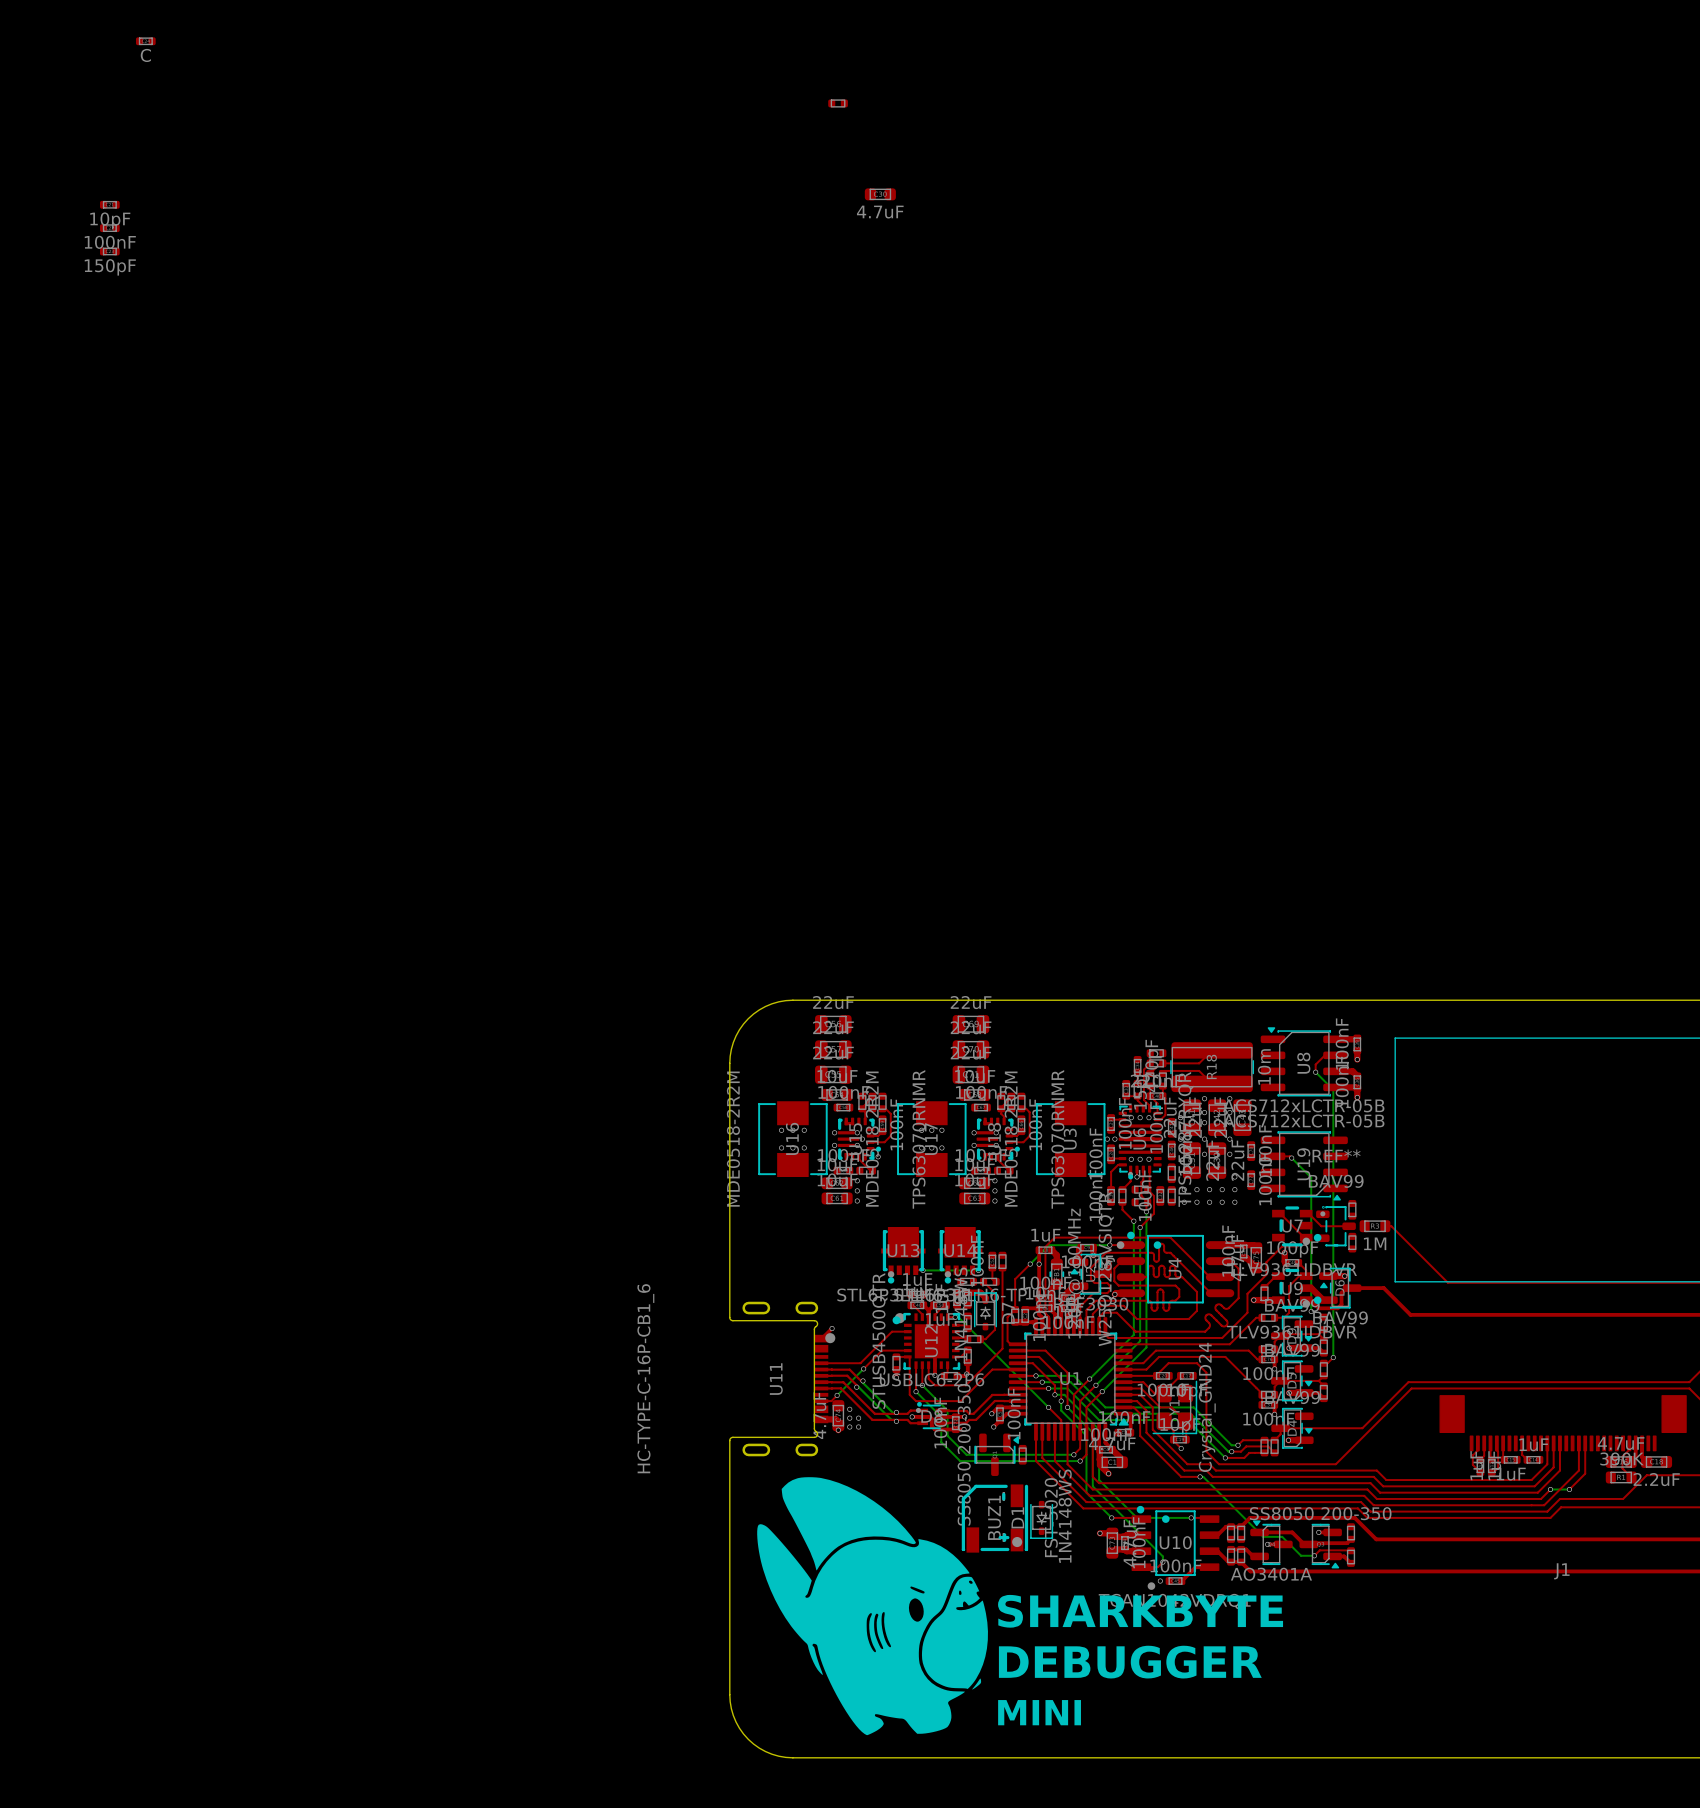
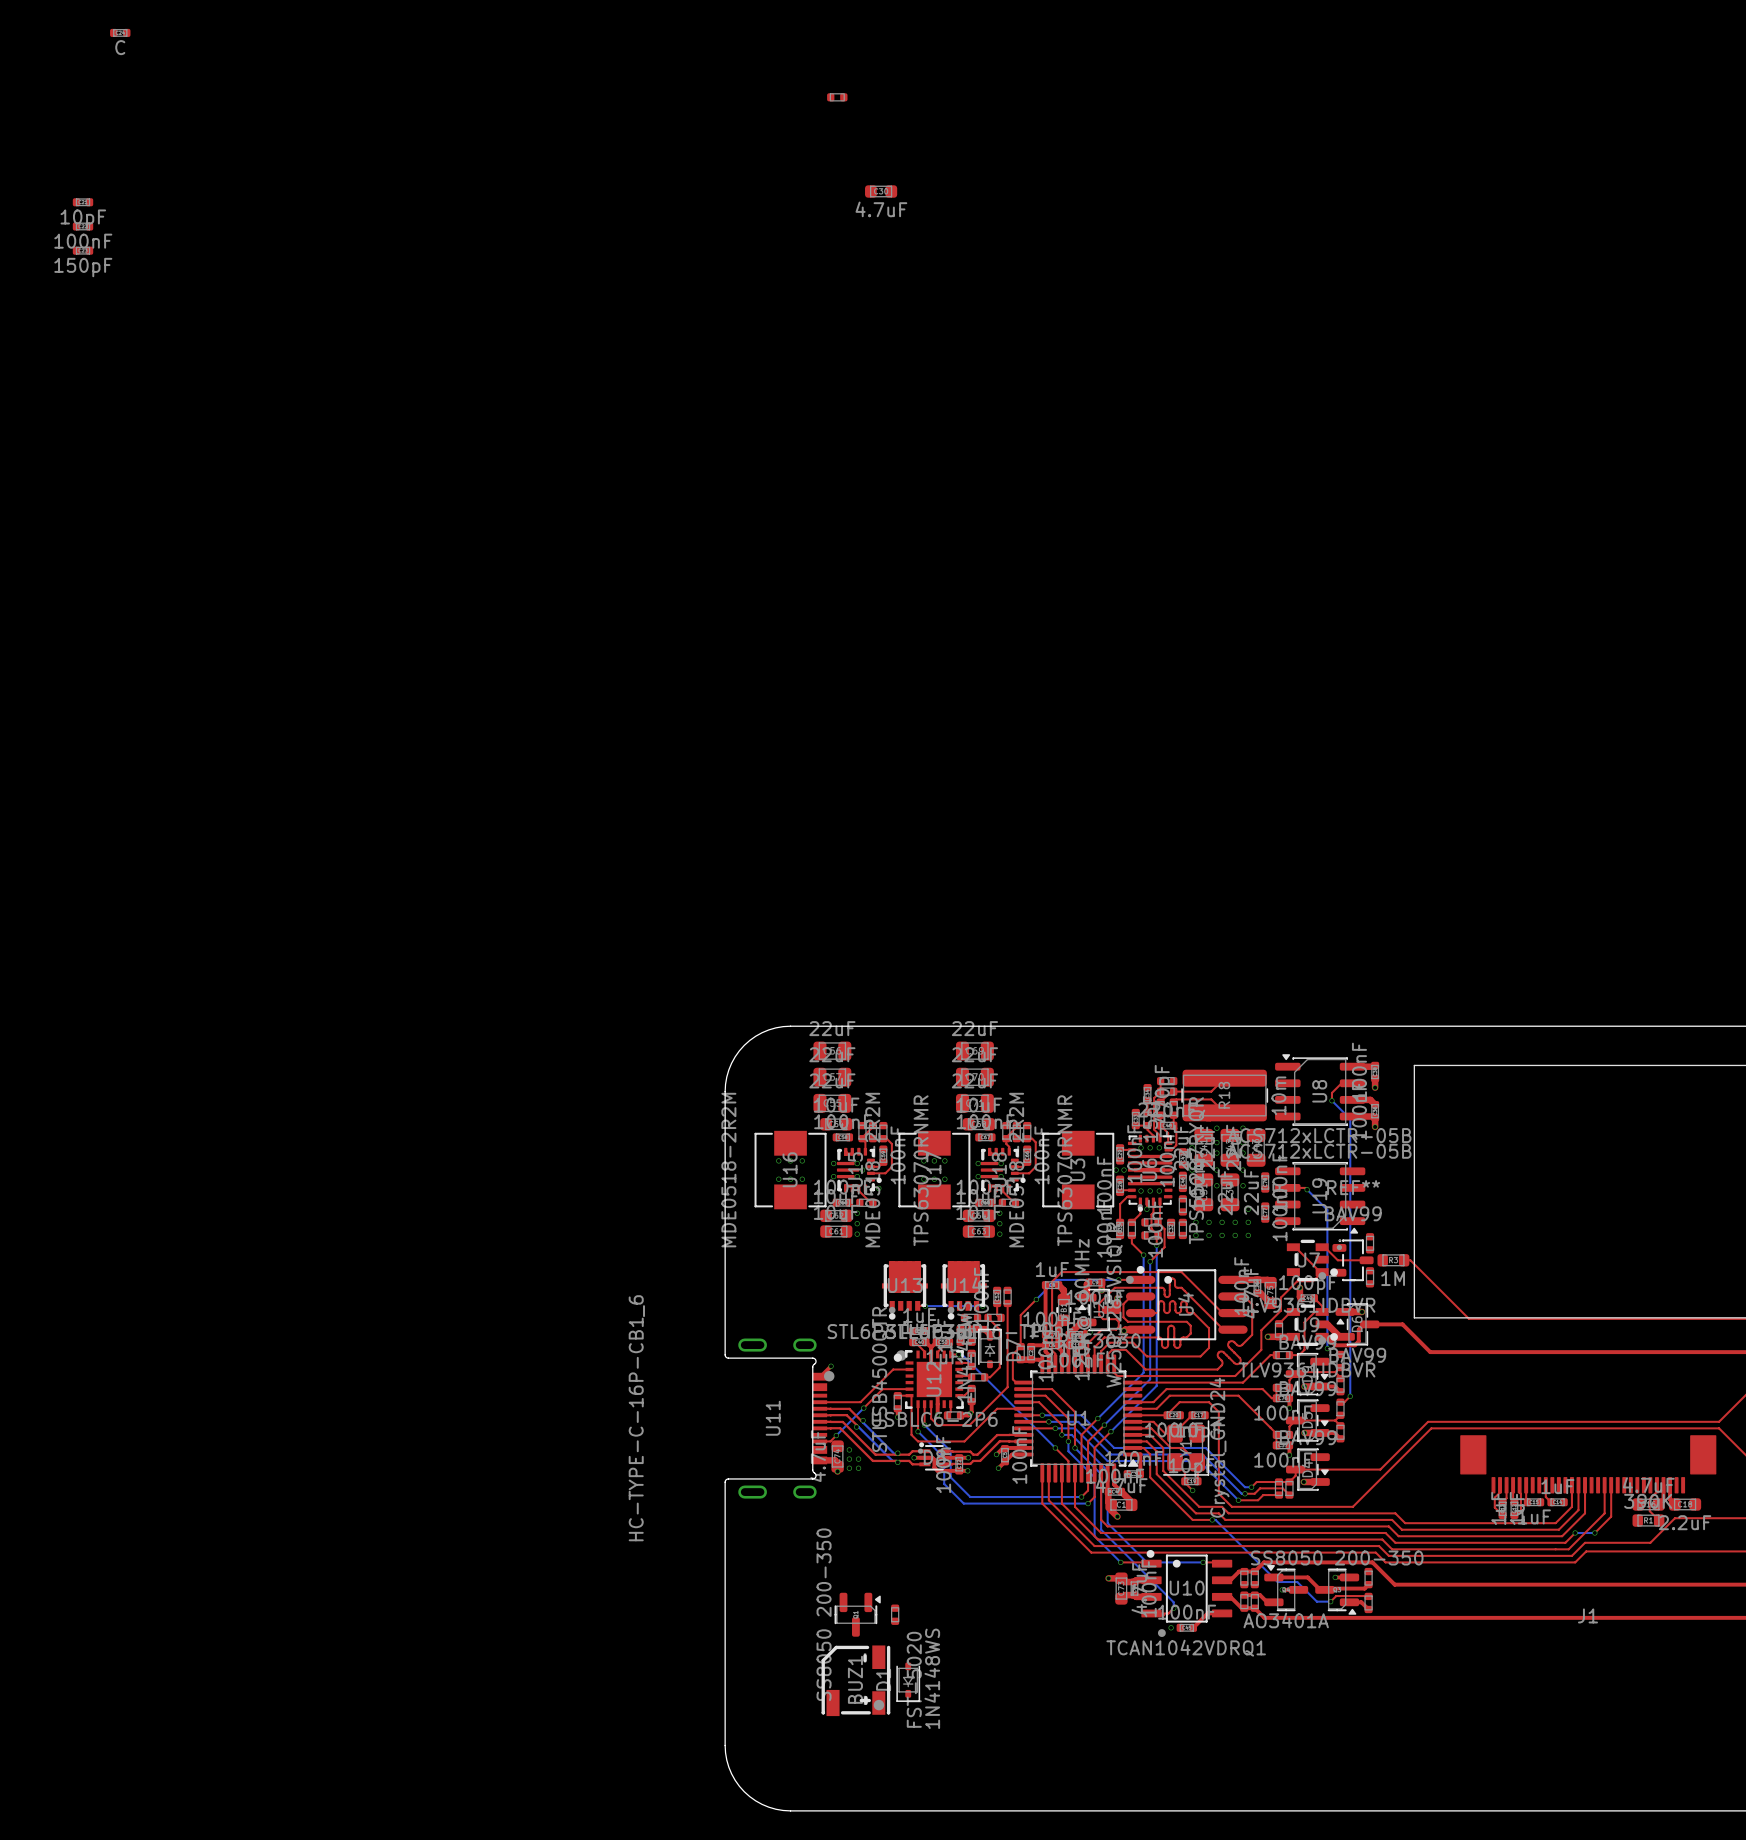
via: (1039, 1264) -> none
part position: (996, 1454) -> (857, 1614)
part position: (1022, 1454) -> (895, 1614)
BUZ1 position: (994, 1518) -> (855, 1680)
D1 position: (1041, 1519) -> (908, 1682)
part: (872, 1606) -> none
text: SHARKBYTE (1140, 1611) -> none
text: DEBUGGER (1130, 1662) -> none
text: MINI (1039, 1712) -> none

